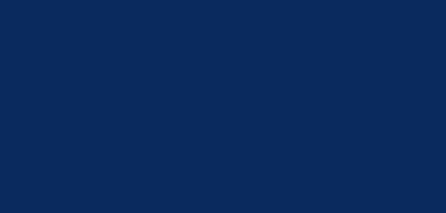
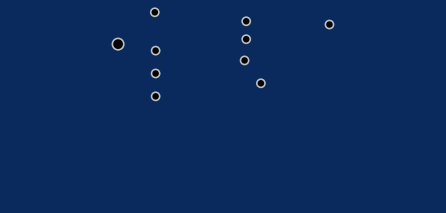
via: none -> (154, 12)
via: none -> (246, 21)
via: none -> (329, 24)
via: none -> (246, 39)
via: none -> (118, 44)
via: none -> (155, 50)
via: none -> (244, 60)
via: none -> (155, 73)
via: none -> (260, 83)
via: none -> (155, 96)

